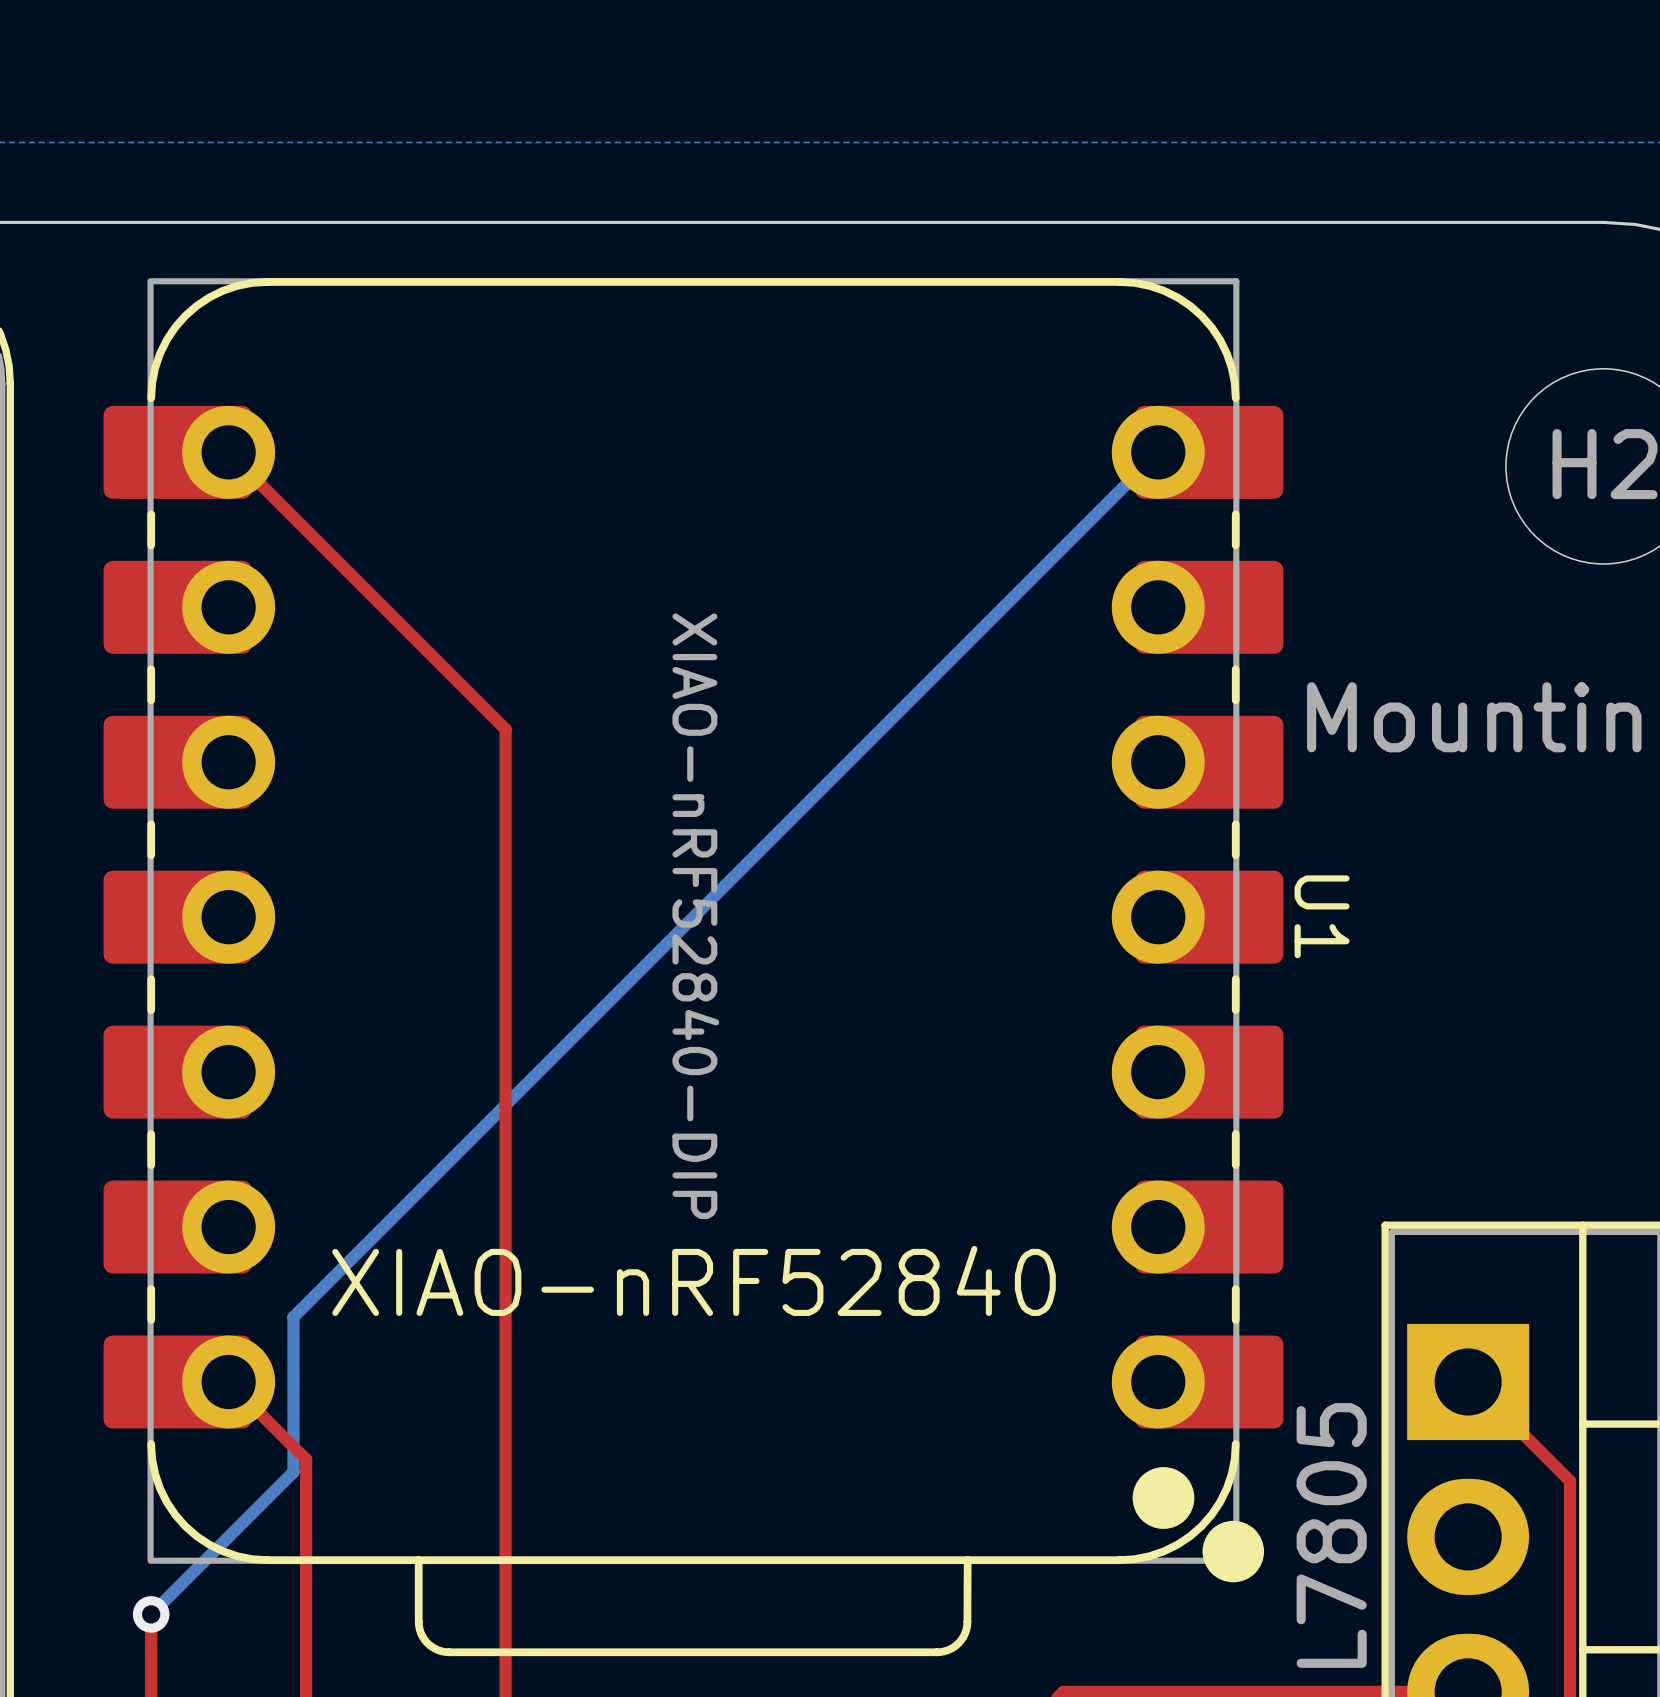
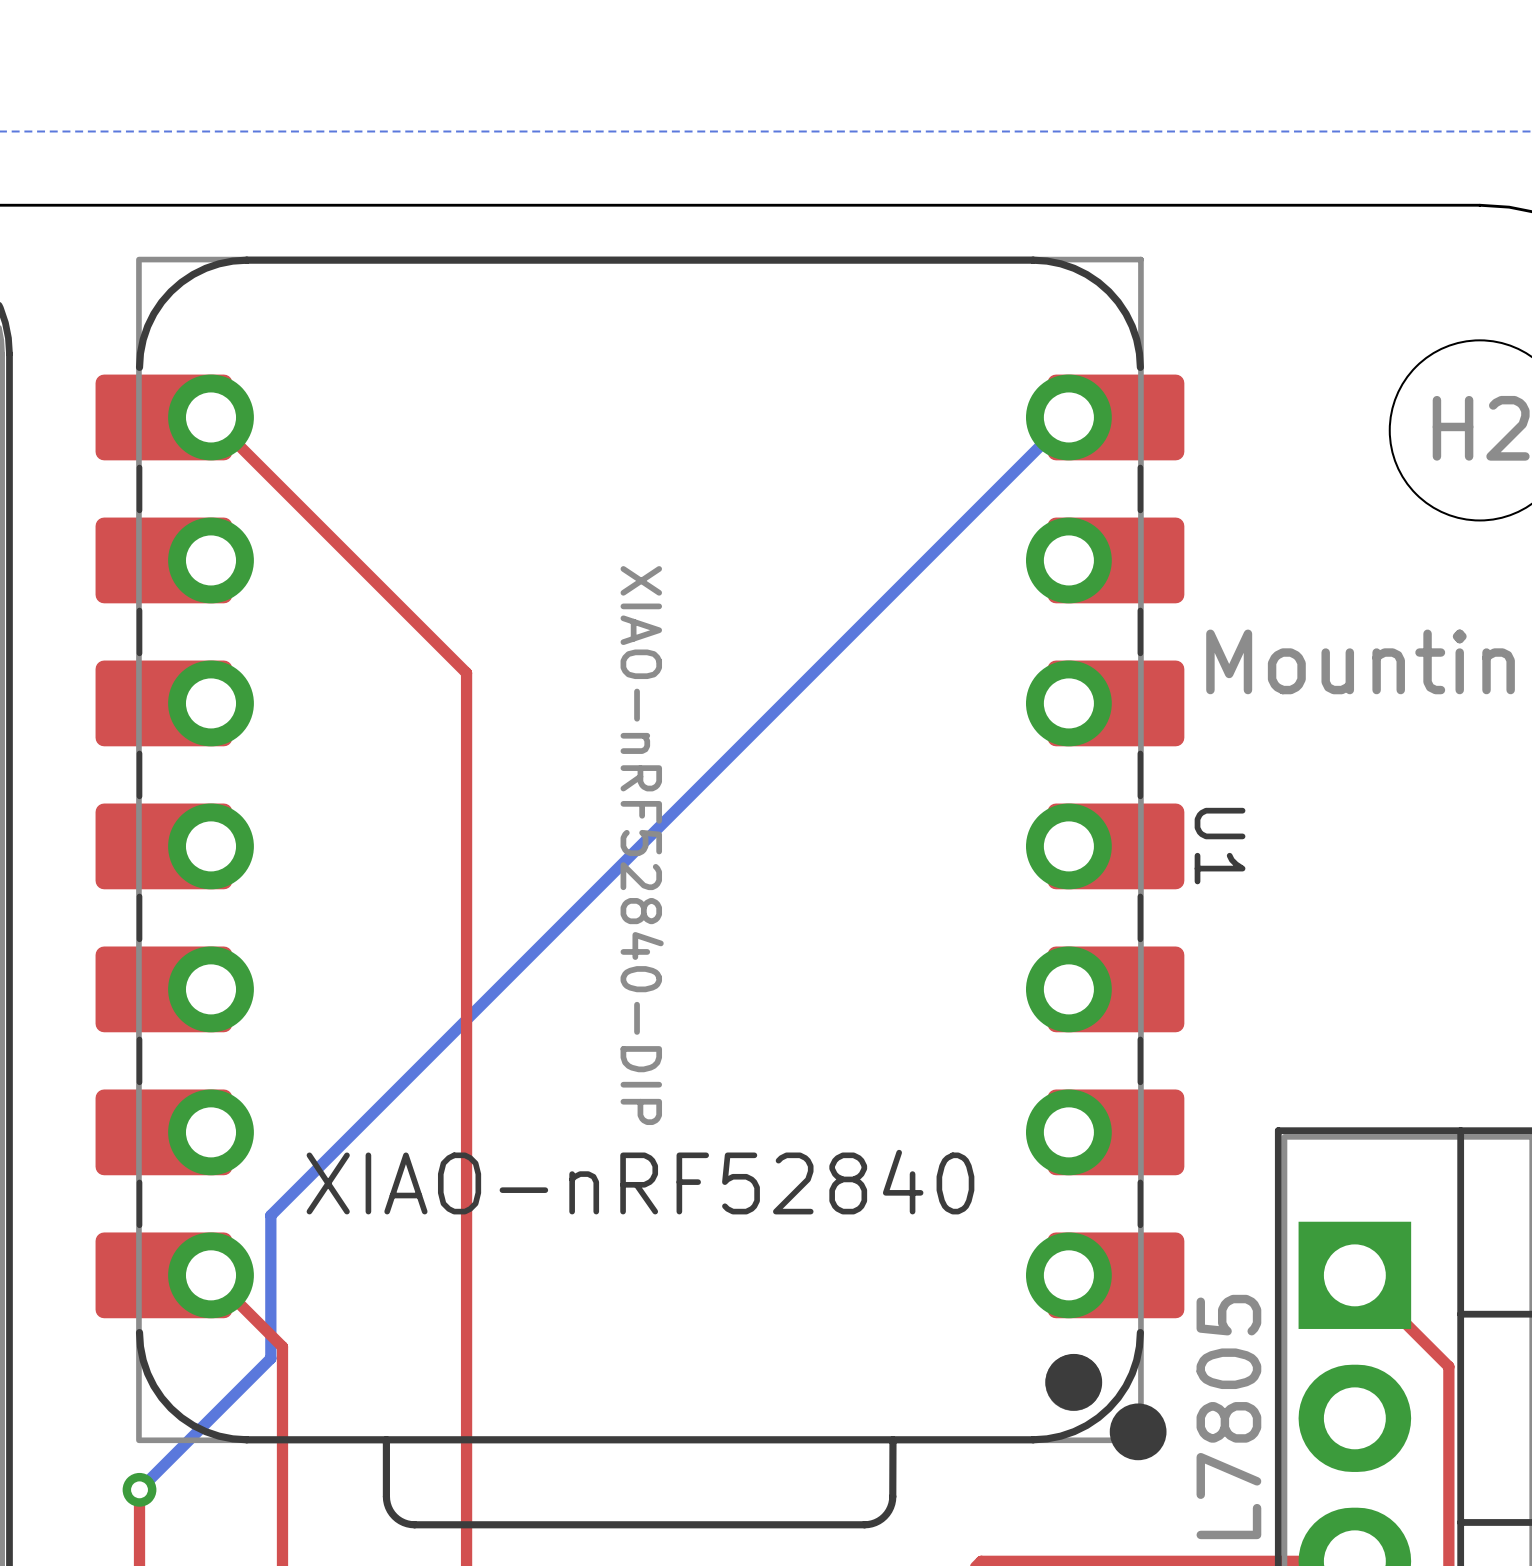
U1 footprint: [103, 278, 1284, 1657] -> [95, 256, 1185, 1529]

